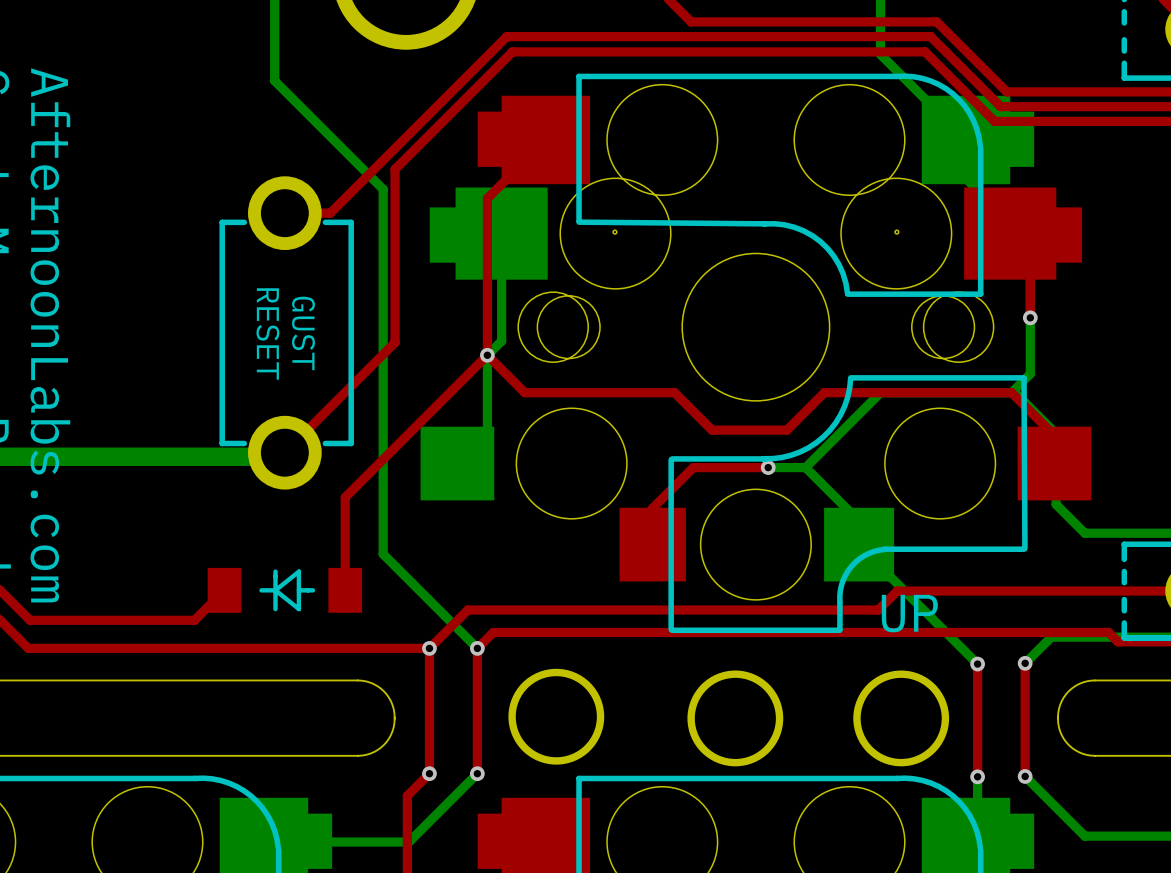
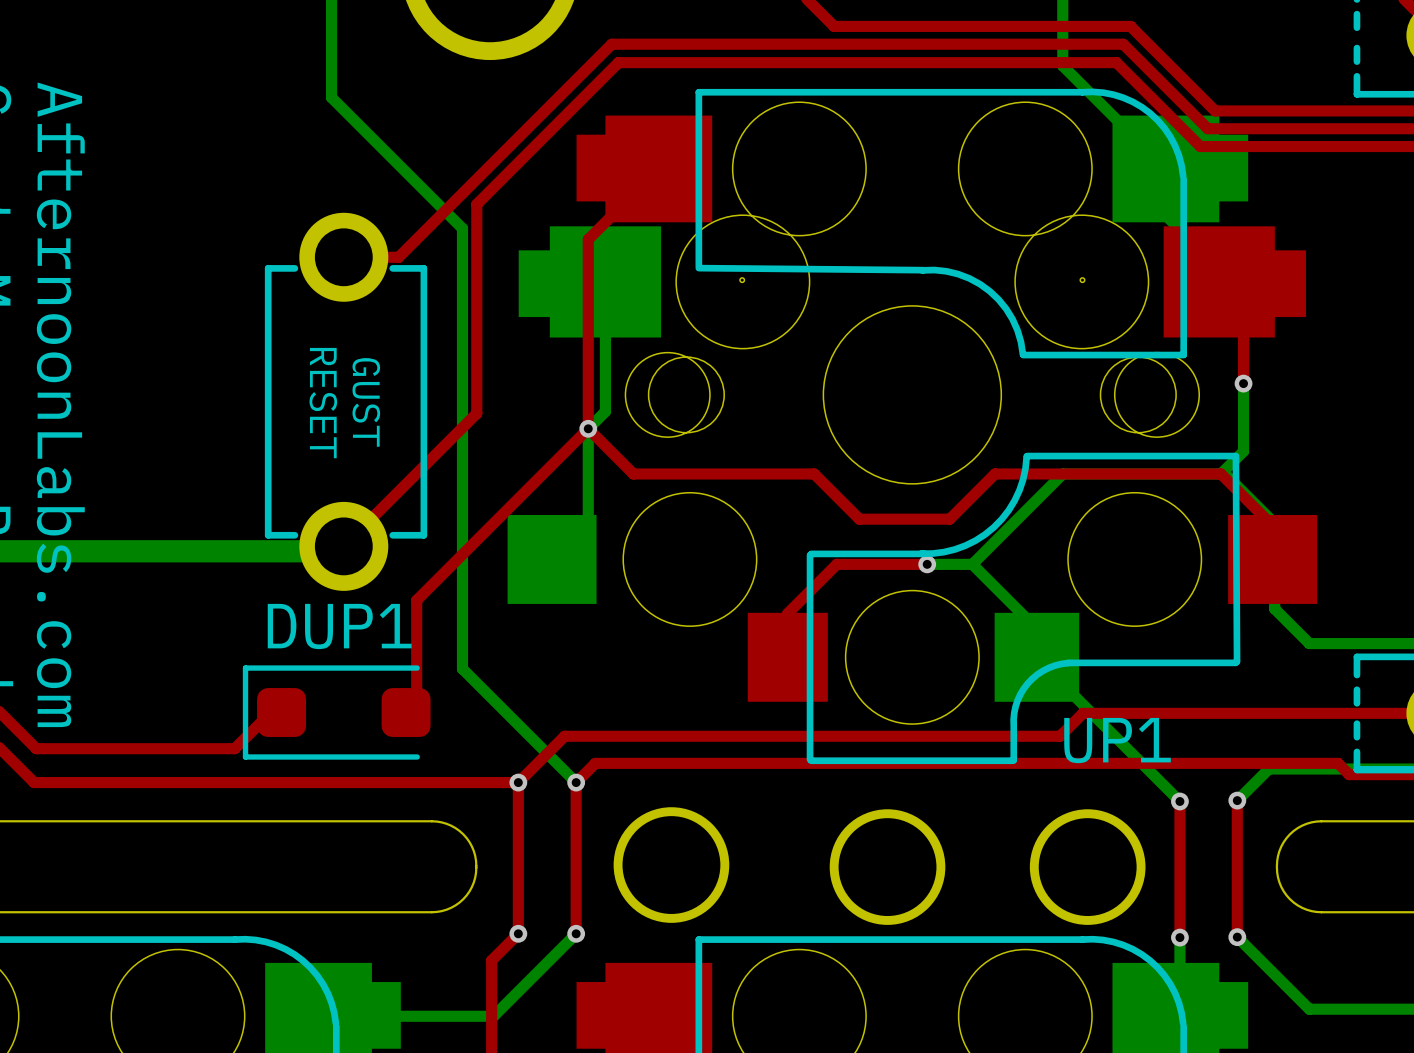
DUP1: none -> (336, 712)
part: (284, 590) -> none
UP name: UP (909, 613) -> UP1 (1117, 740)

